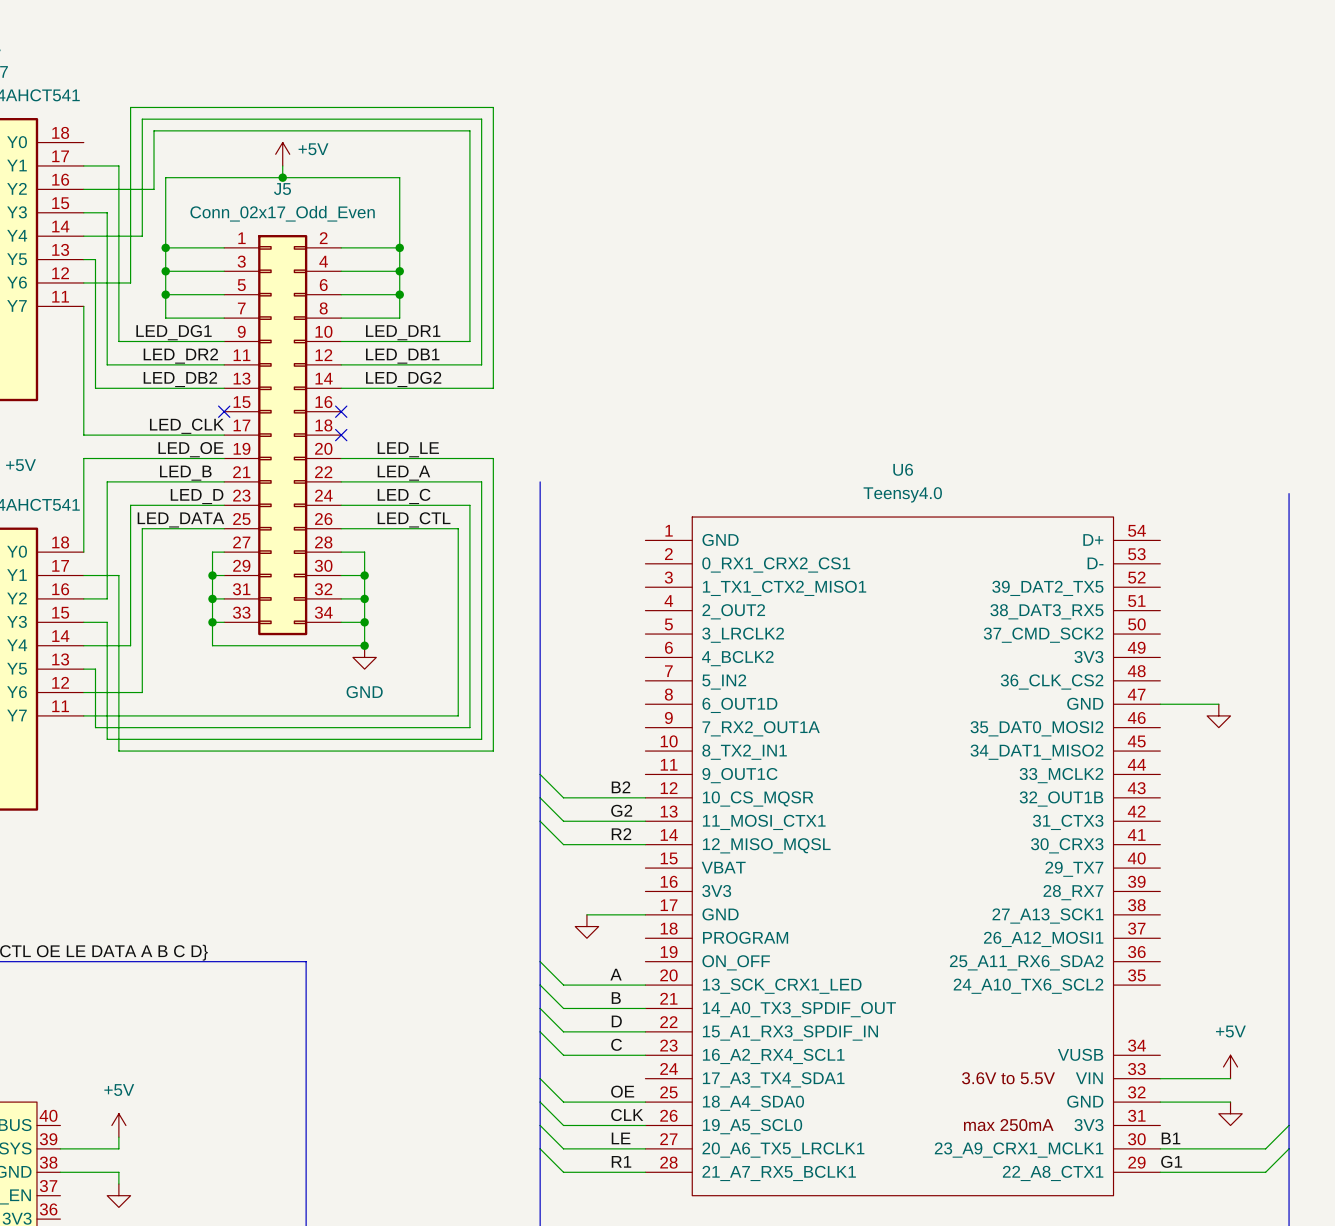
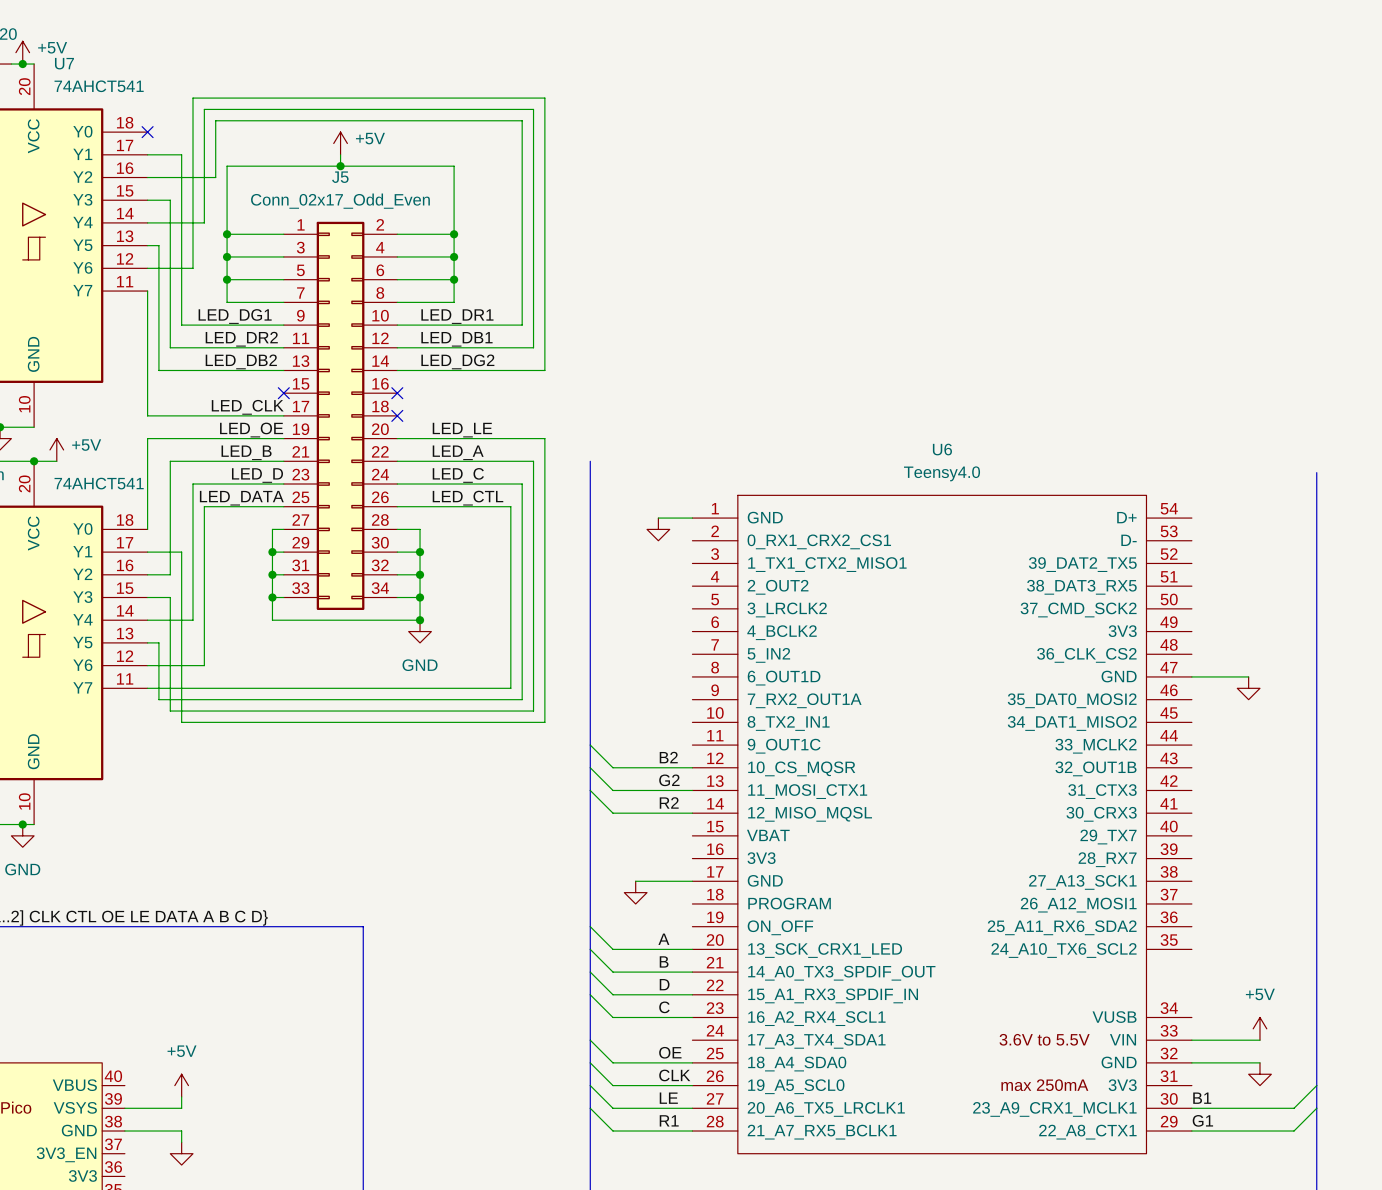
no-connect mark: none -> (147, 132)
wire: none -> (658, 518) (692, 518)
power symbol: none -> (658, 529)

